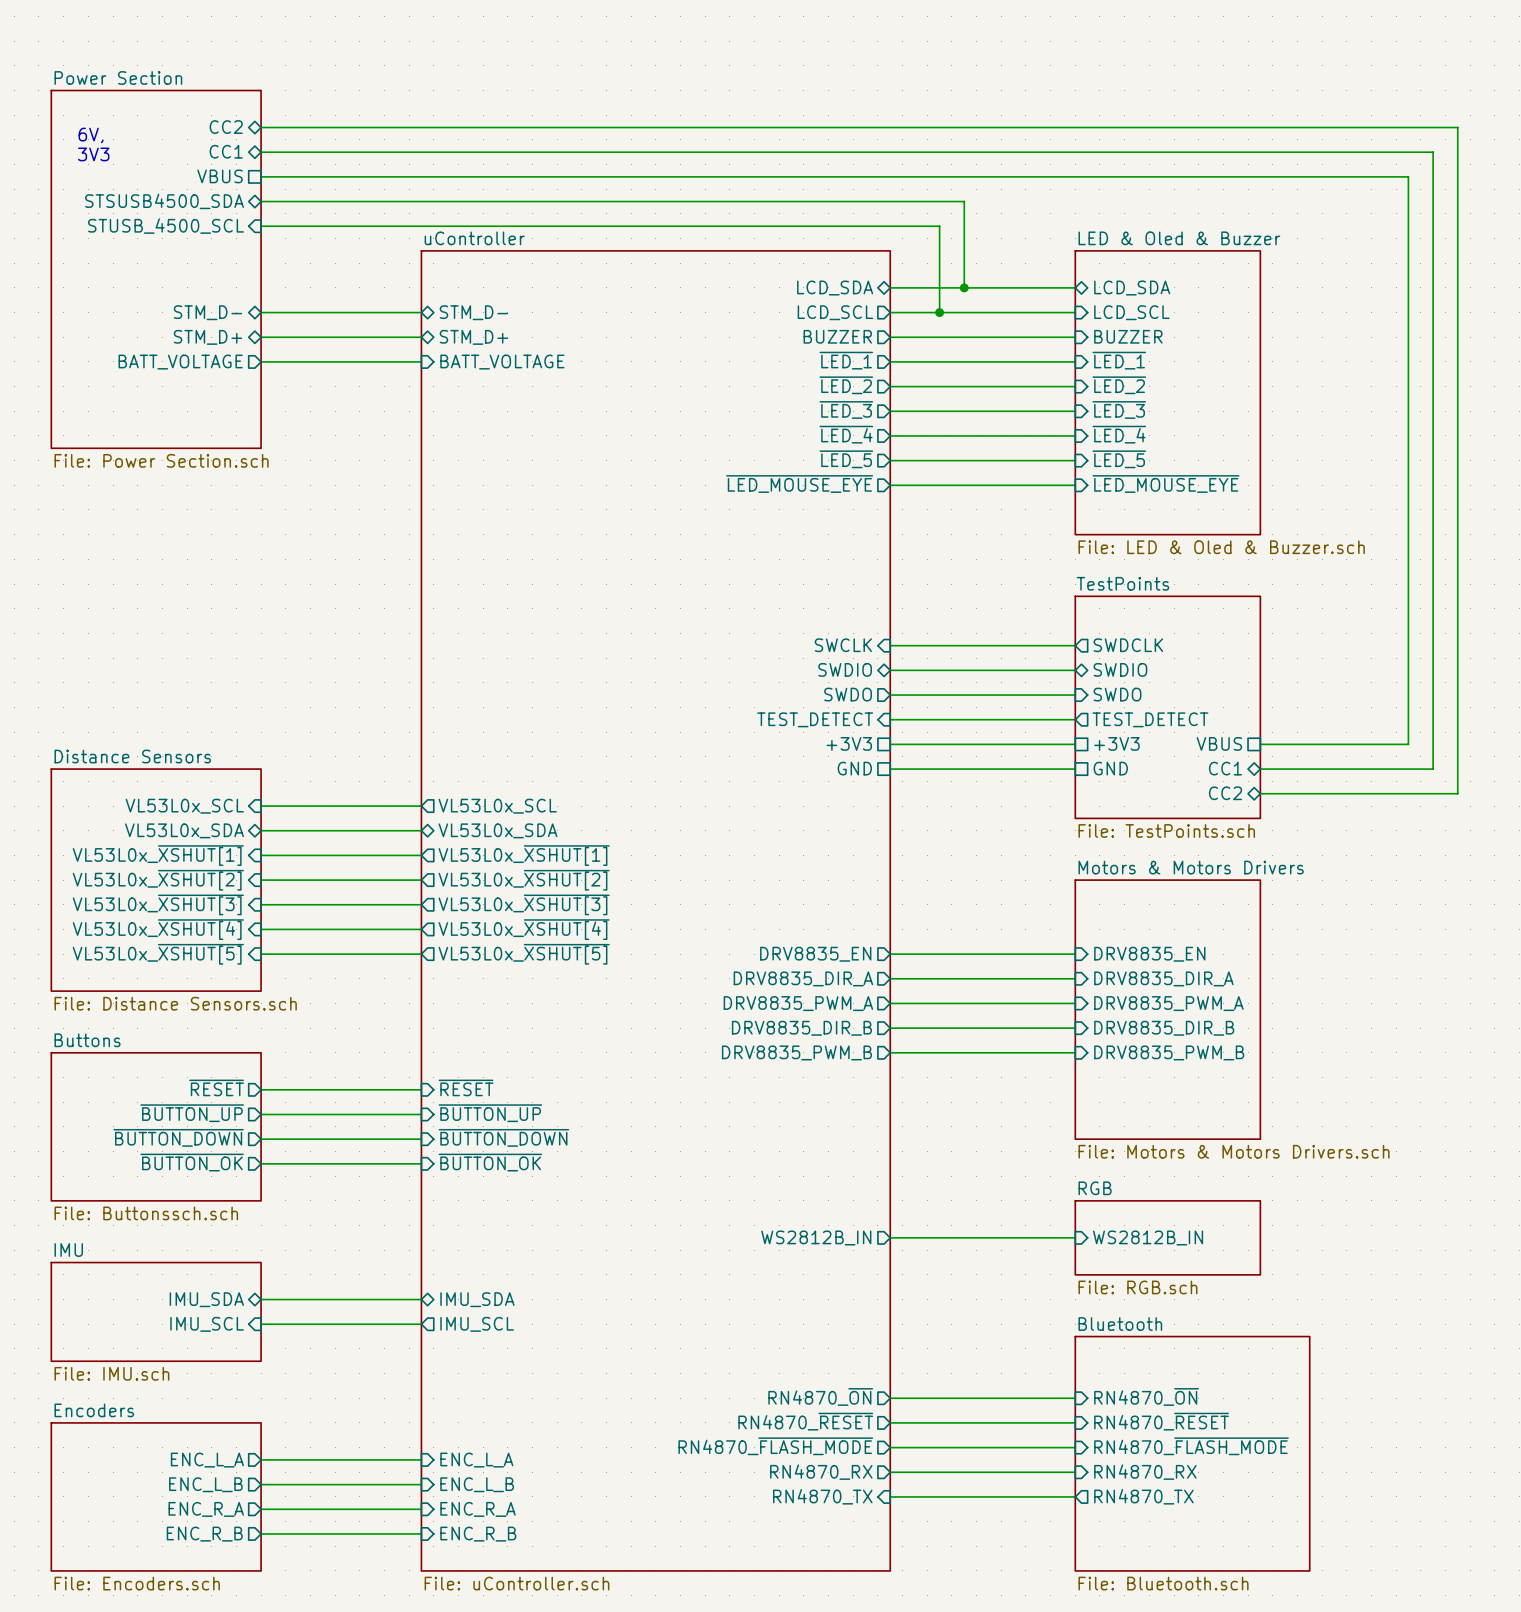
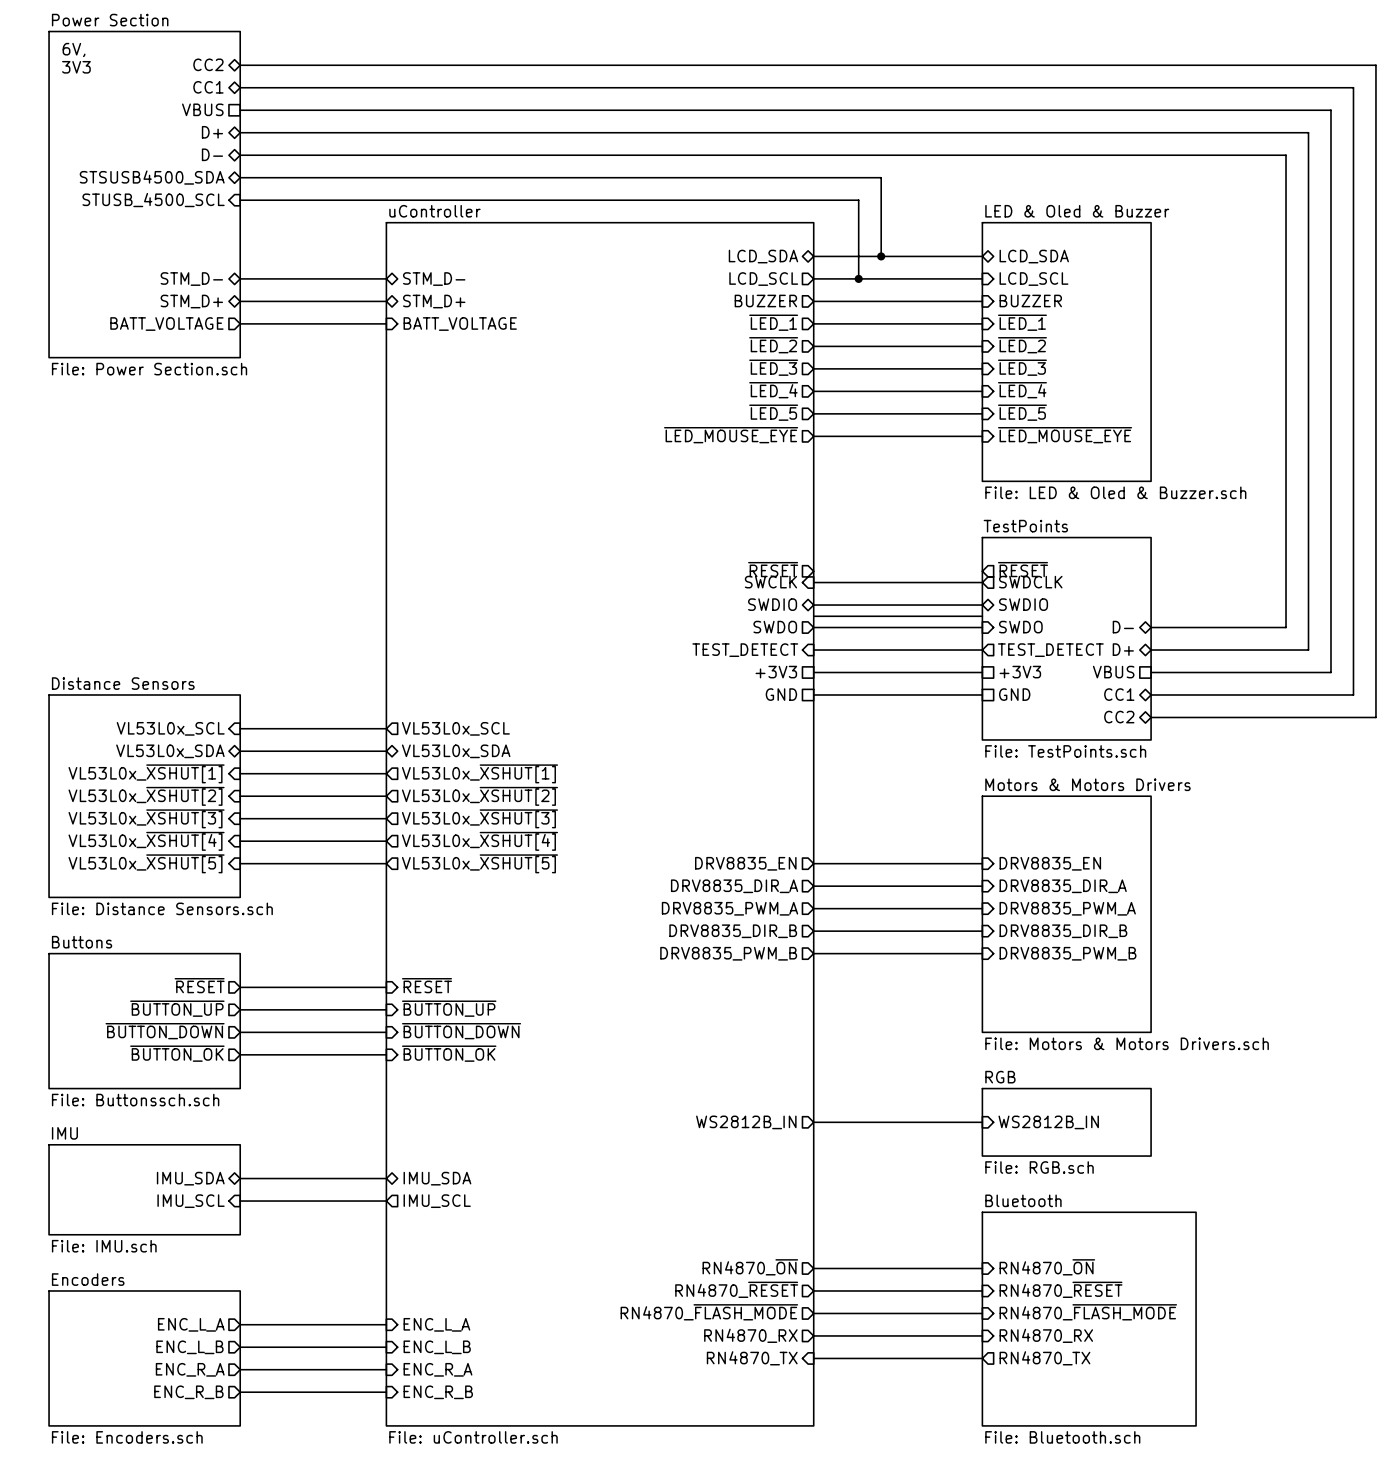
sheet pin: none -> CC2 (208, 64)
sheet pin: none -> CC1 (208, 87)
wire: none -> (240, 87) (1353, 87) (1353, 694) (1308, 694)
sheet pin shape: bidirectional (226, 127) -> passive (202, 109)
sheet pin: CC2 (226, 127) -> VBUS (202, 109)
text position: 6V, (91, 135) -> 6V, (74, 49)
sheet pin: CC1 (226, 151) -> D+ (212, 132)
text position: 3V3 (93, 154) -> 3V3 (76, 67)
sheet pin shape: passive (220, 176) -> bidirectional (212, 154)
sheet pin: VBUS (220, 176) -> D- (212, 154)
sheet Power Section position: (156, 269) -> (144, 194)
sheet pin: none -> ~{RESET} (773, 569)
sheet pin: none -> ~{RESET} (1023, 569)
wire: none -> (813, 616) (982, 616)
sheet pin: none -> D- (1123, 627)
wire: none -> (1151, 627) (1286, 627)
wire: (1408, 695) (1408, 744) -> (1330, 672) (1286, 672)
sheet pin: none -> D+ (1123, 649)
wire: (1433, 719) (1433, 769) -> (1308, 650) (1151, 650)
wire: (1457, 744) (1457, 793) -> (240, 65) (1375, 65) (1375, 717) (1330, 717)

